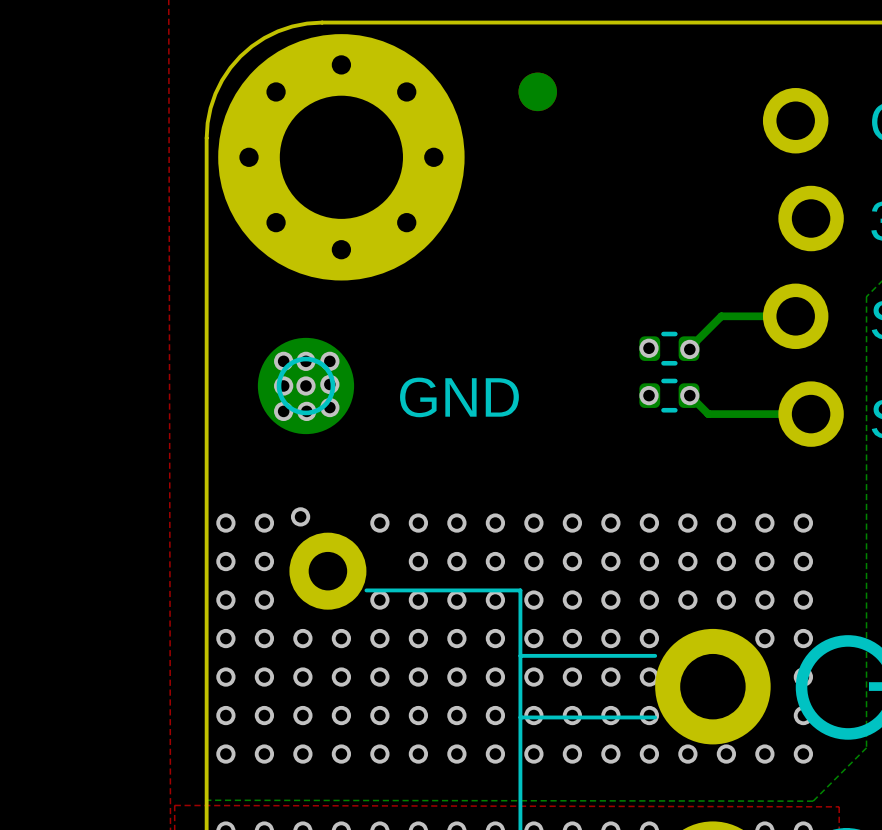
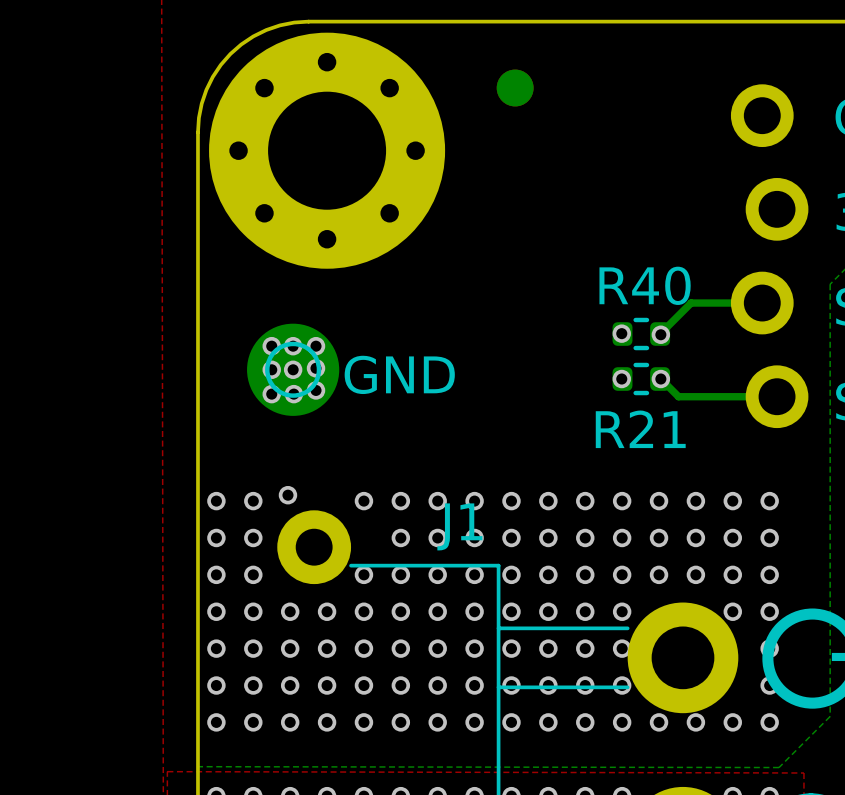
R40 name: none -> R40 (645, 285)
part value position: GND (459, 397) -> GND (399, 374)
R21 name: none -> R21 (640, 429)
J1 name: none -> J1 (459, 526)

